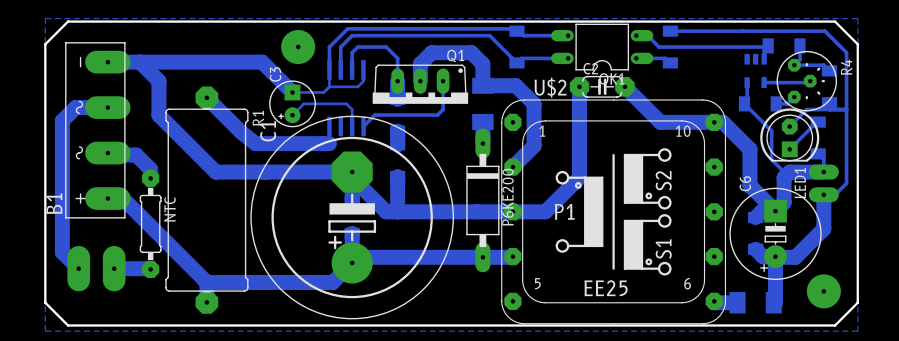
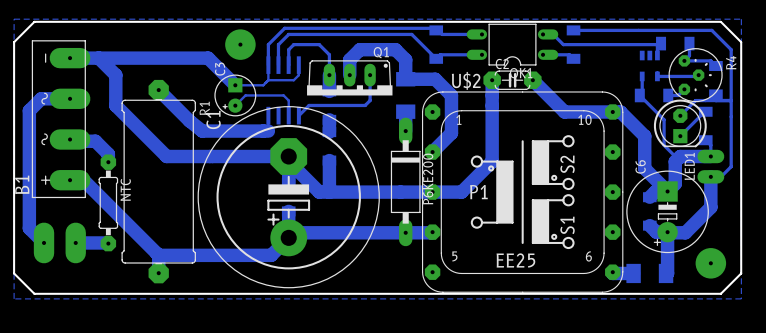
C1 footprint: [250, 115, 455, 320] -> [197, 106, 380, 289]

